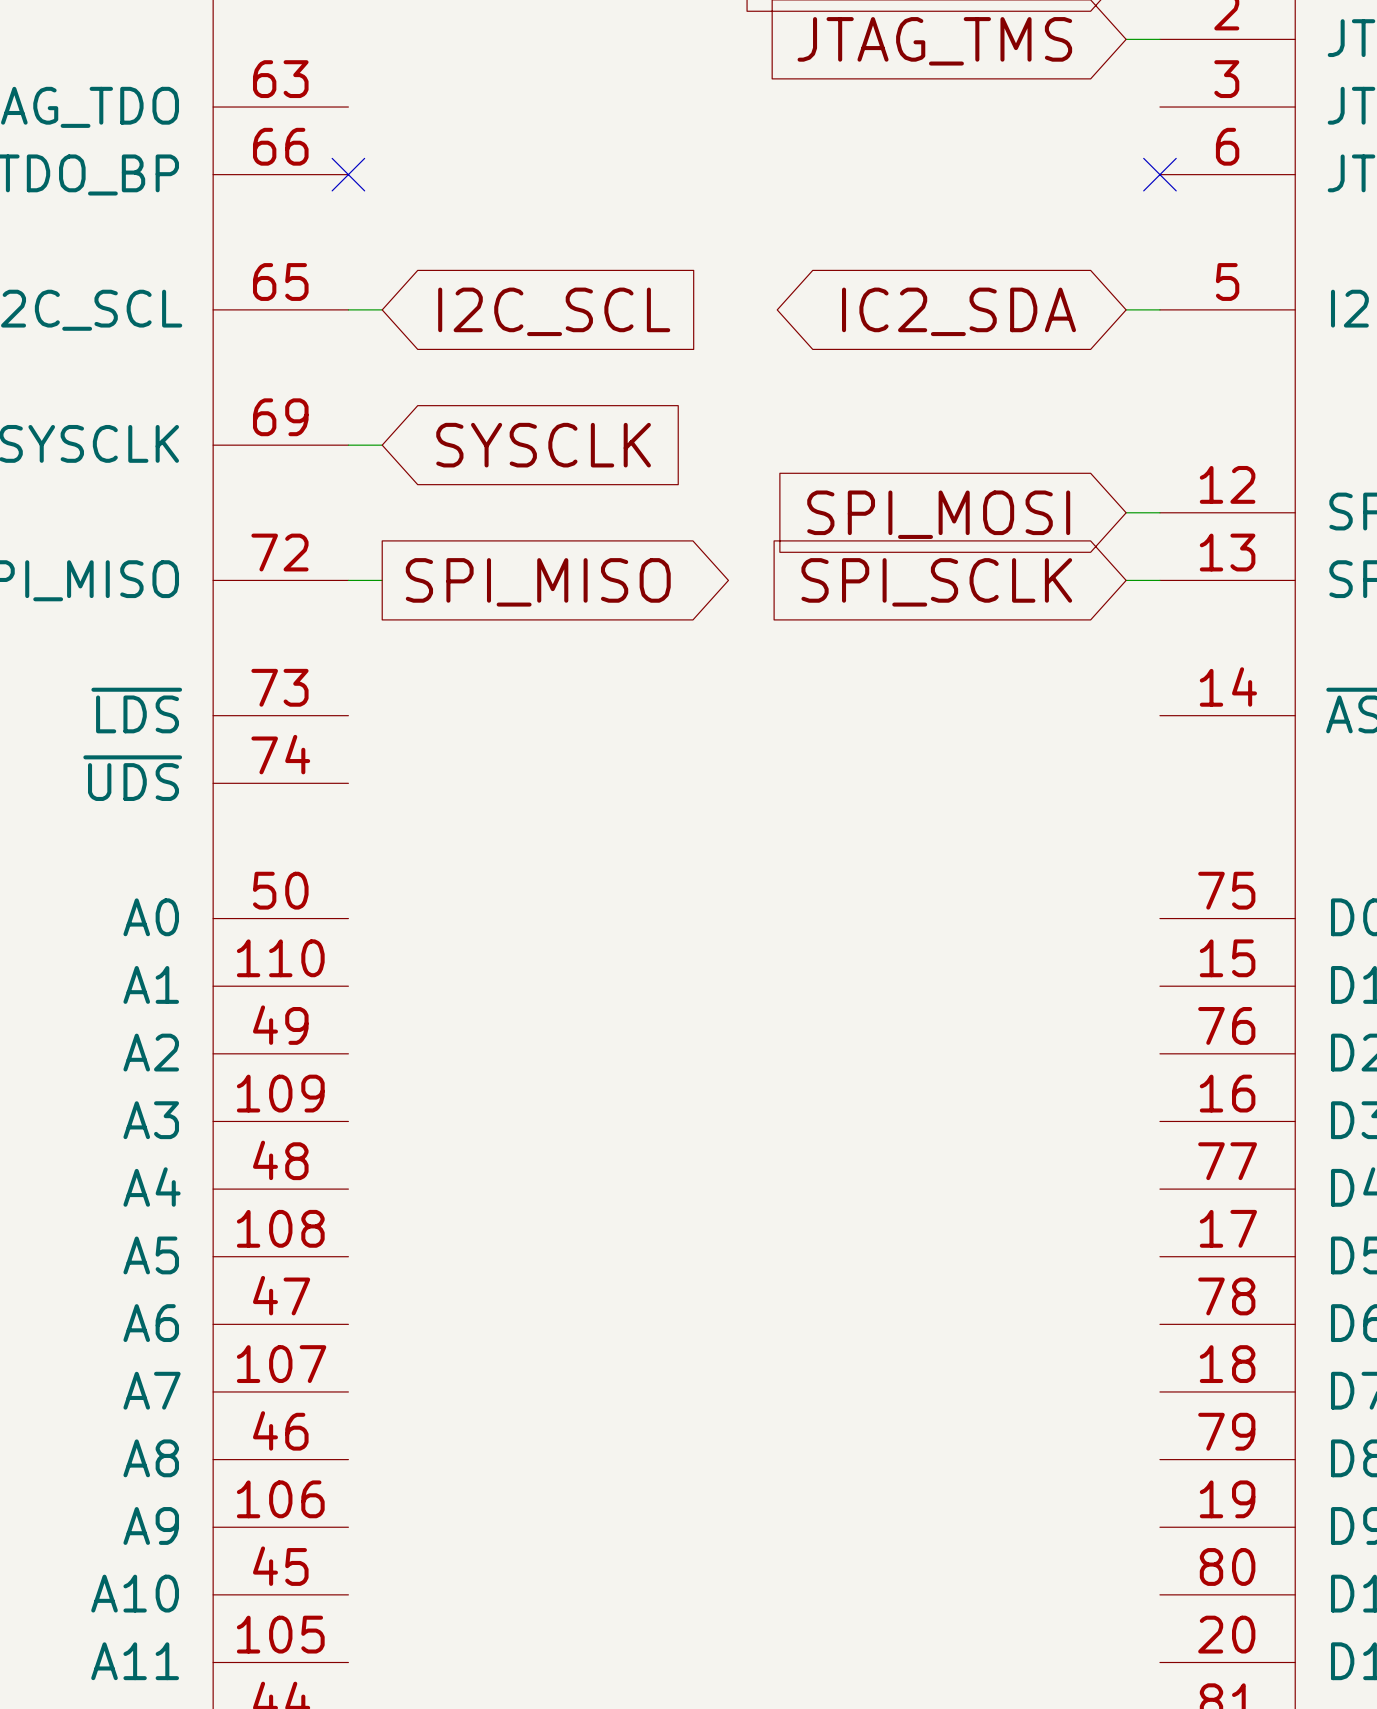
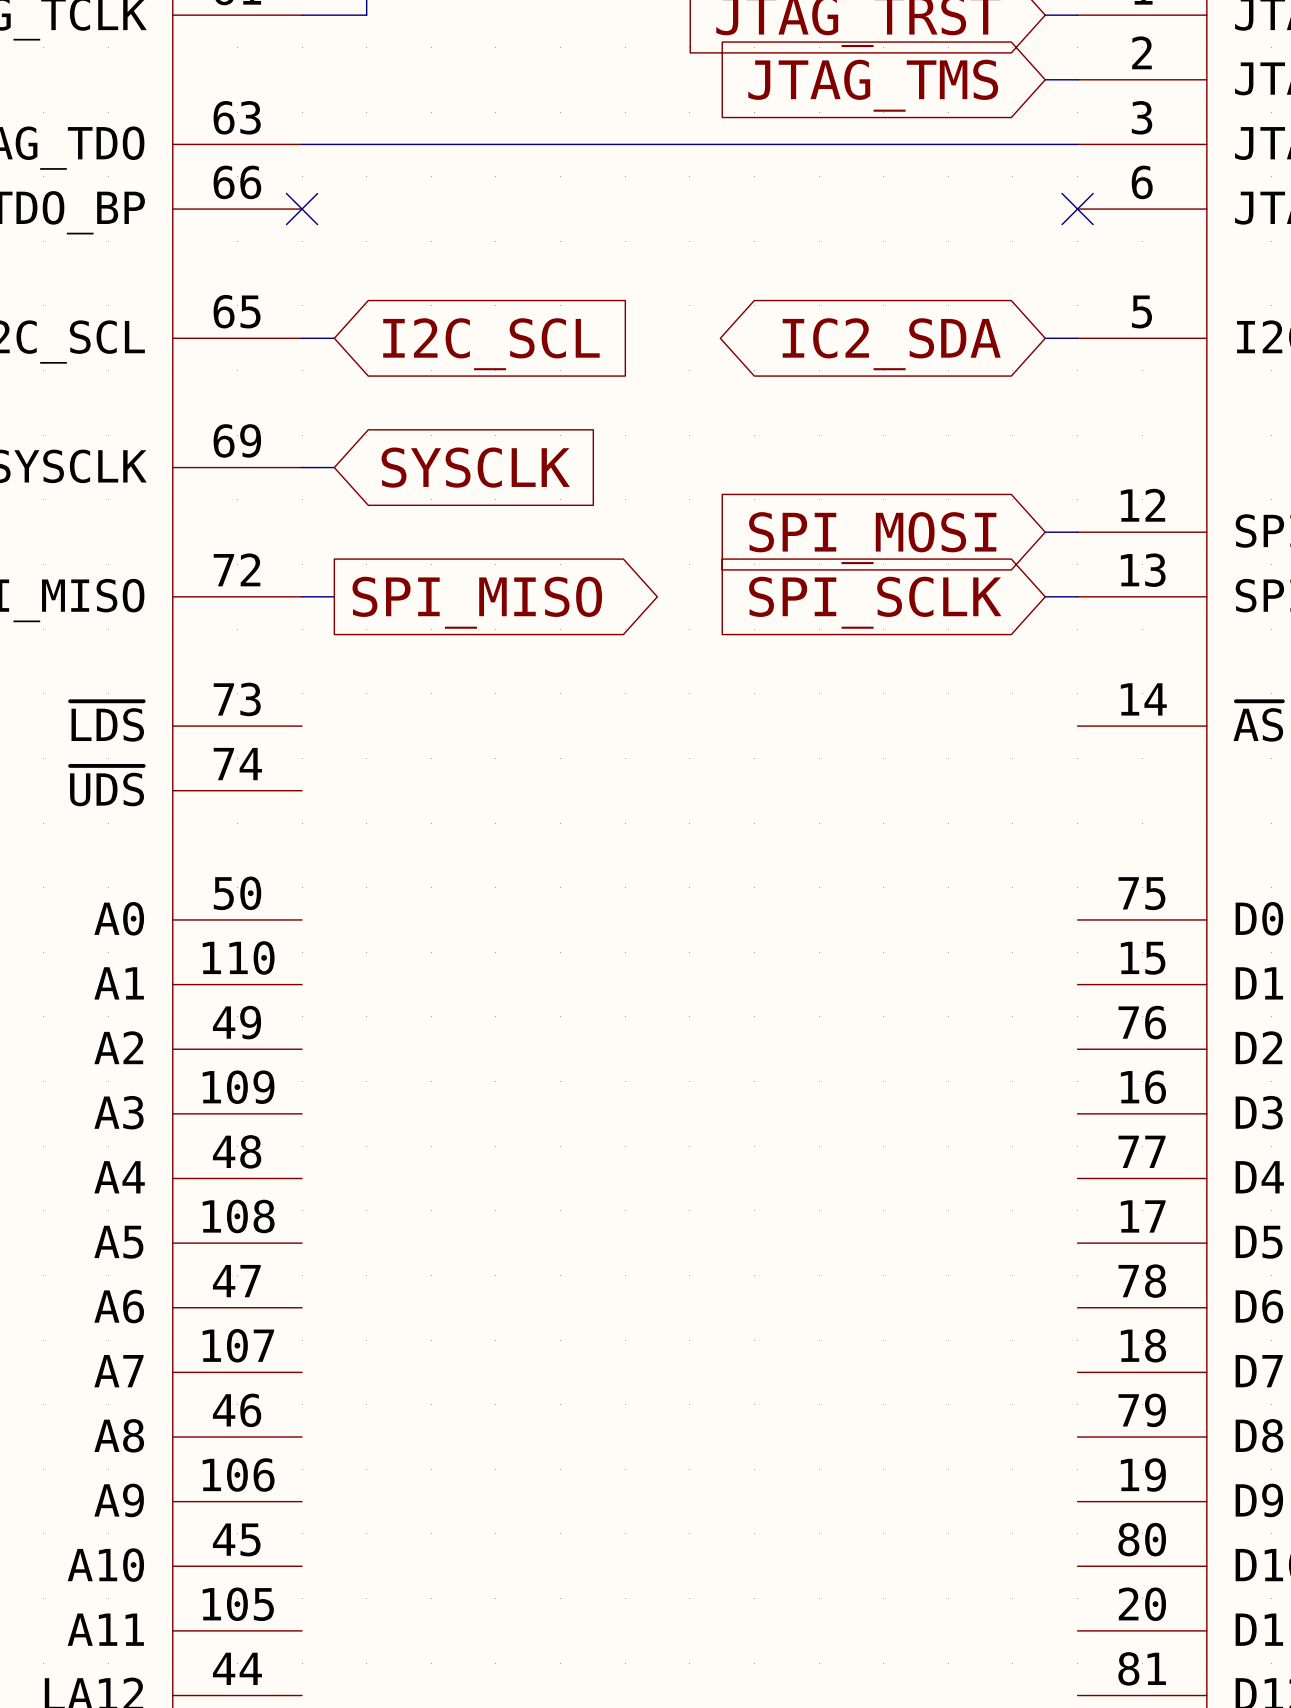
wire: none -> (302, 144) (1077, 144)

